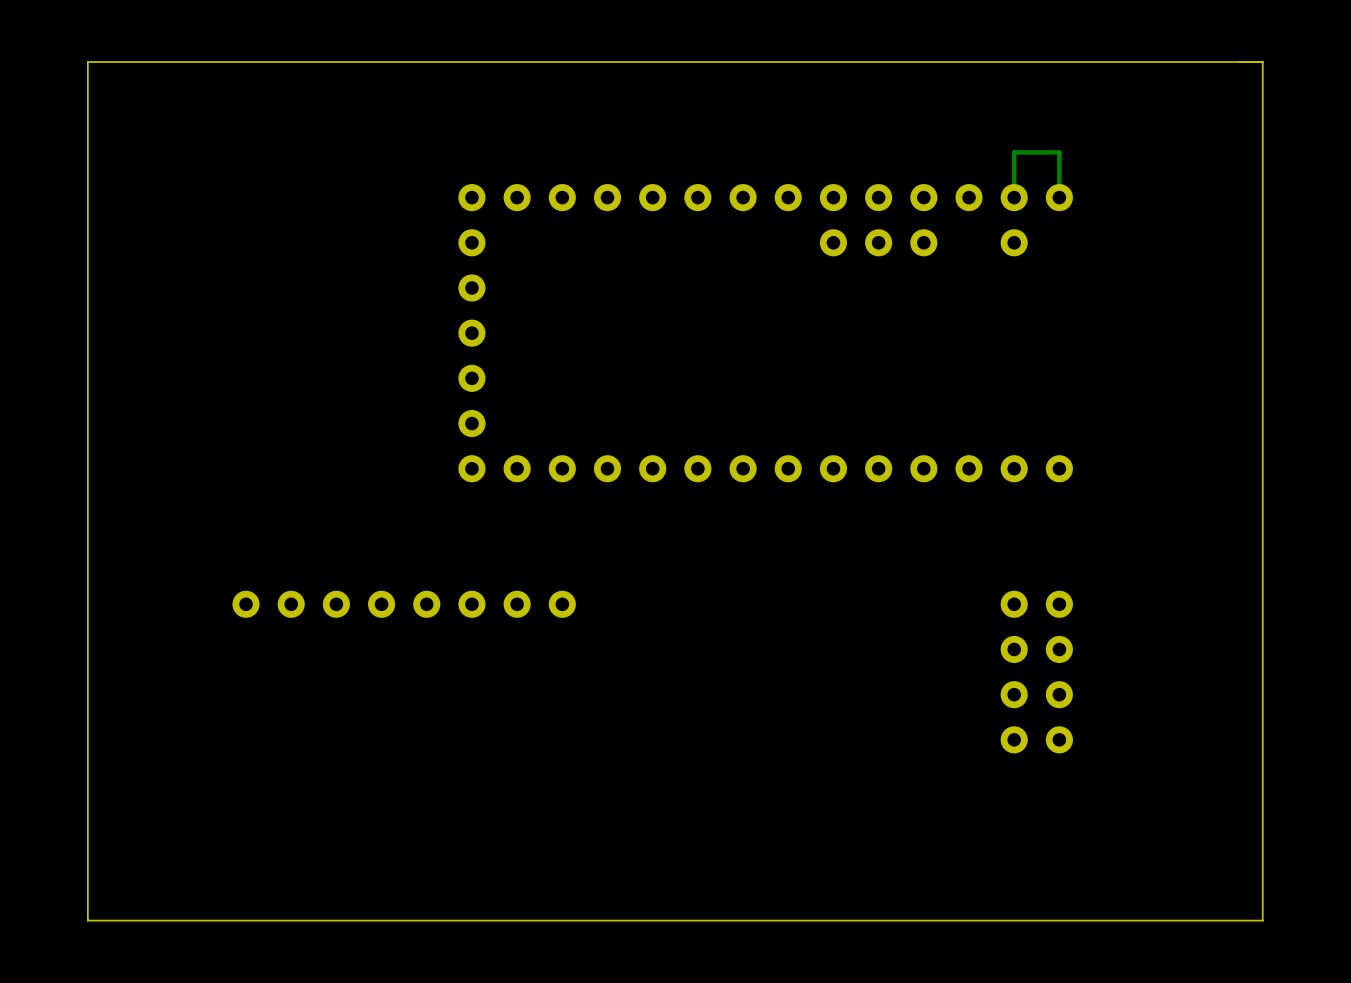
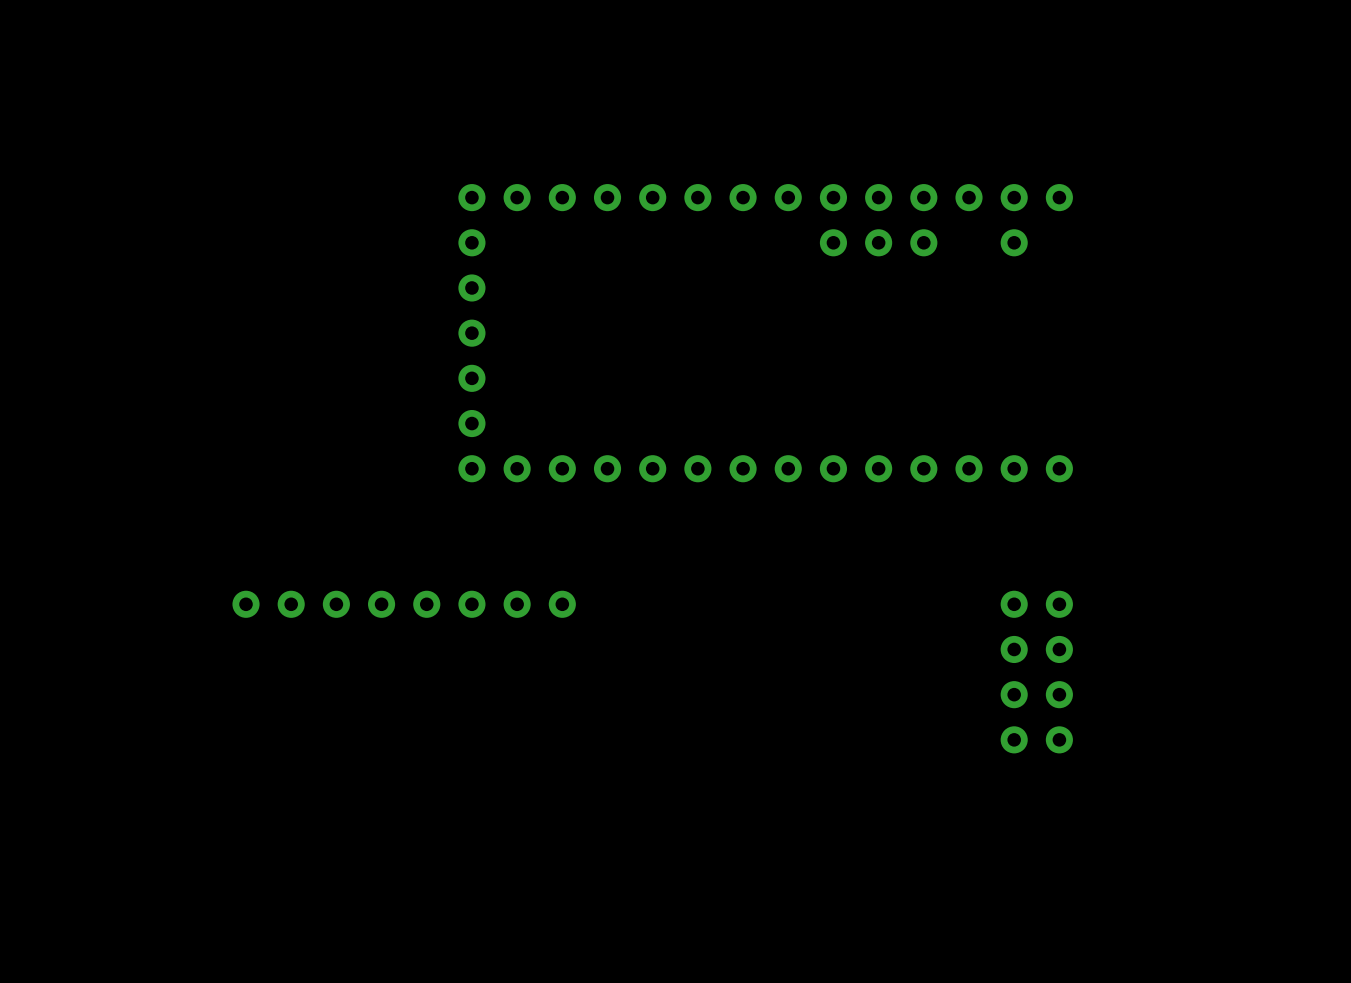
board edge: (1262, 62) (87, 62) (87, 920) (1262, 920) (1262, 62) -> none
bottom track: (1059, 197) (1059, 152) (1014, 152) (1014, 197) -> none

